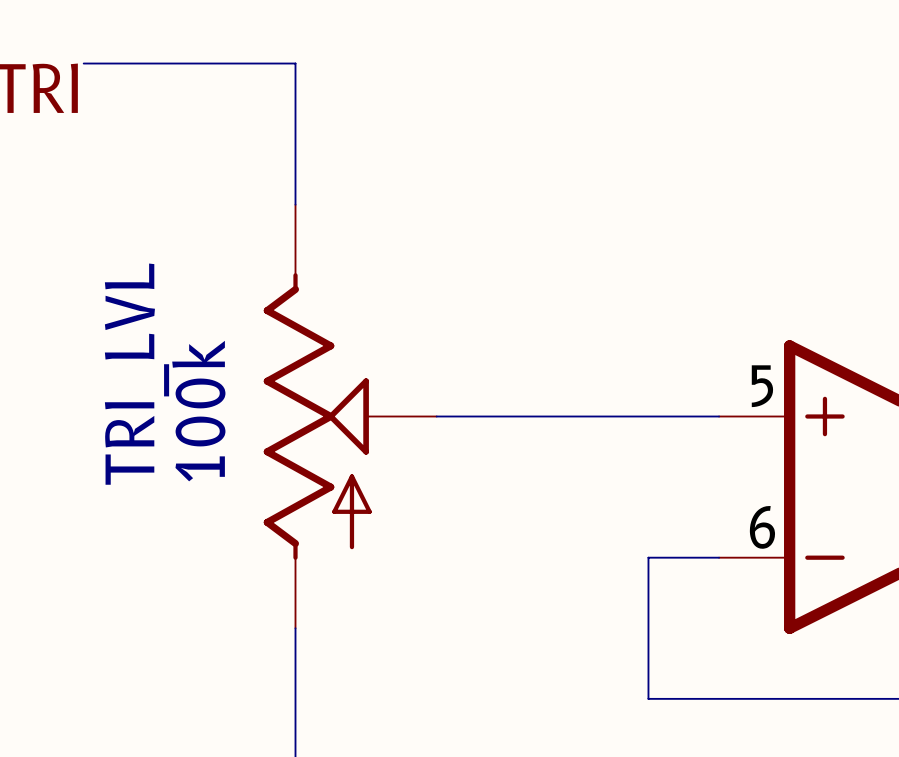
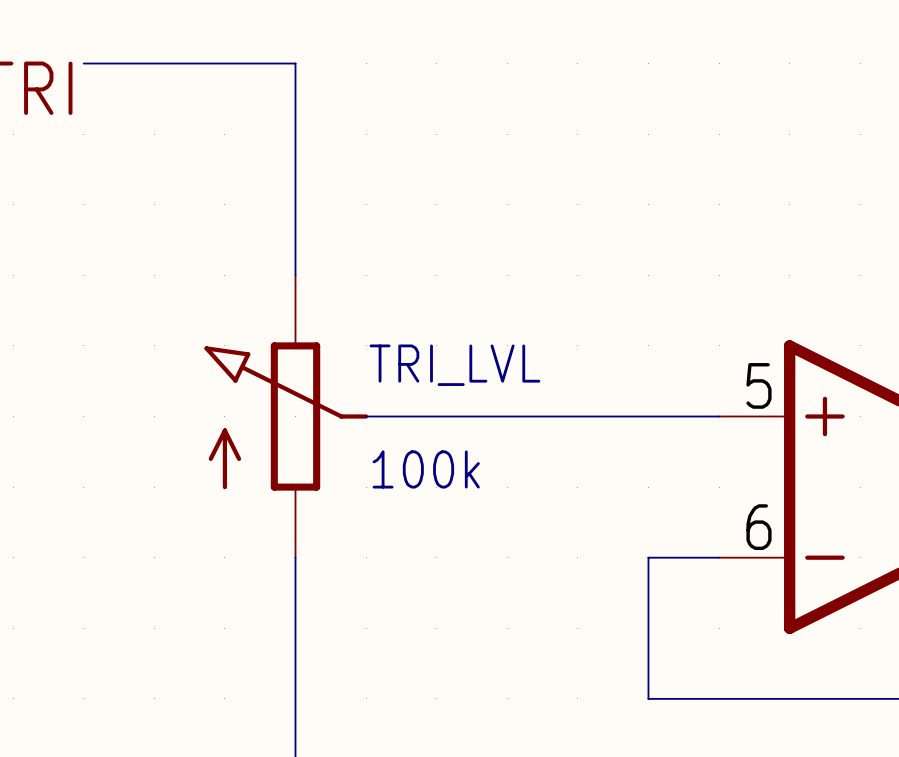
TRI_LVL: none -> 100k (286, 416)
TRI_LVL: 100k (350, 416) -> none

